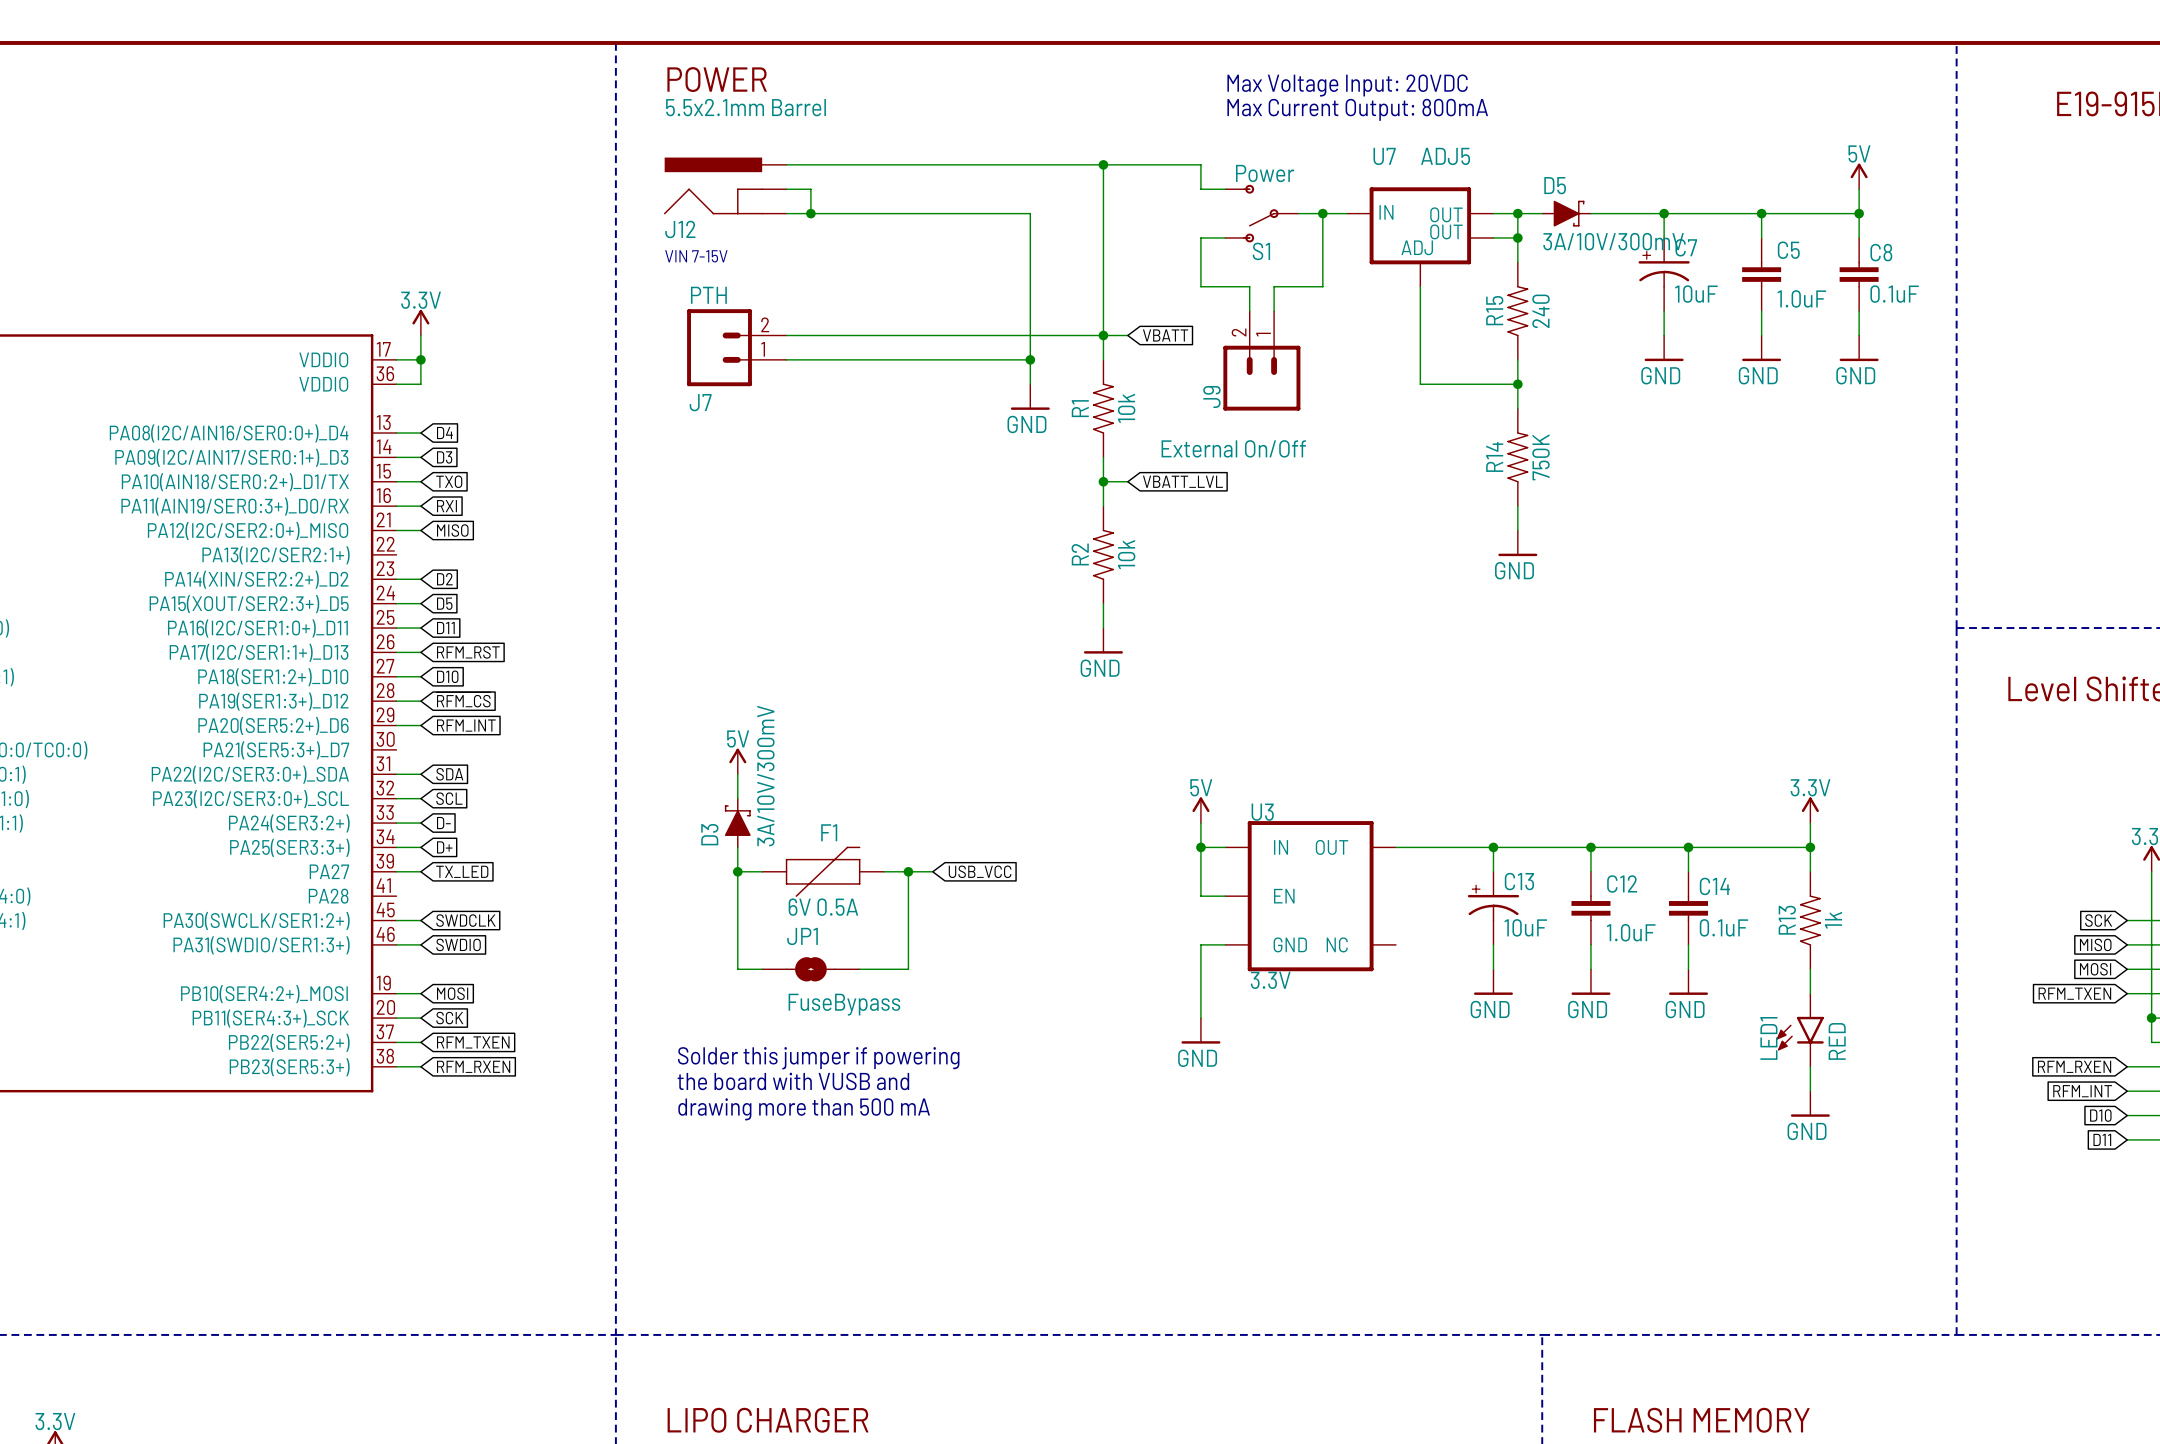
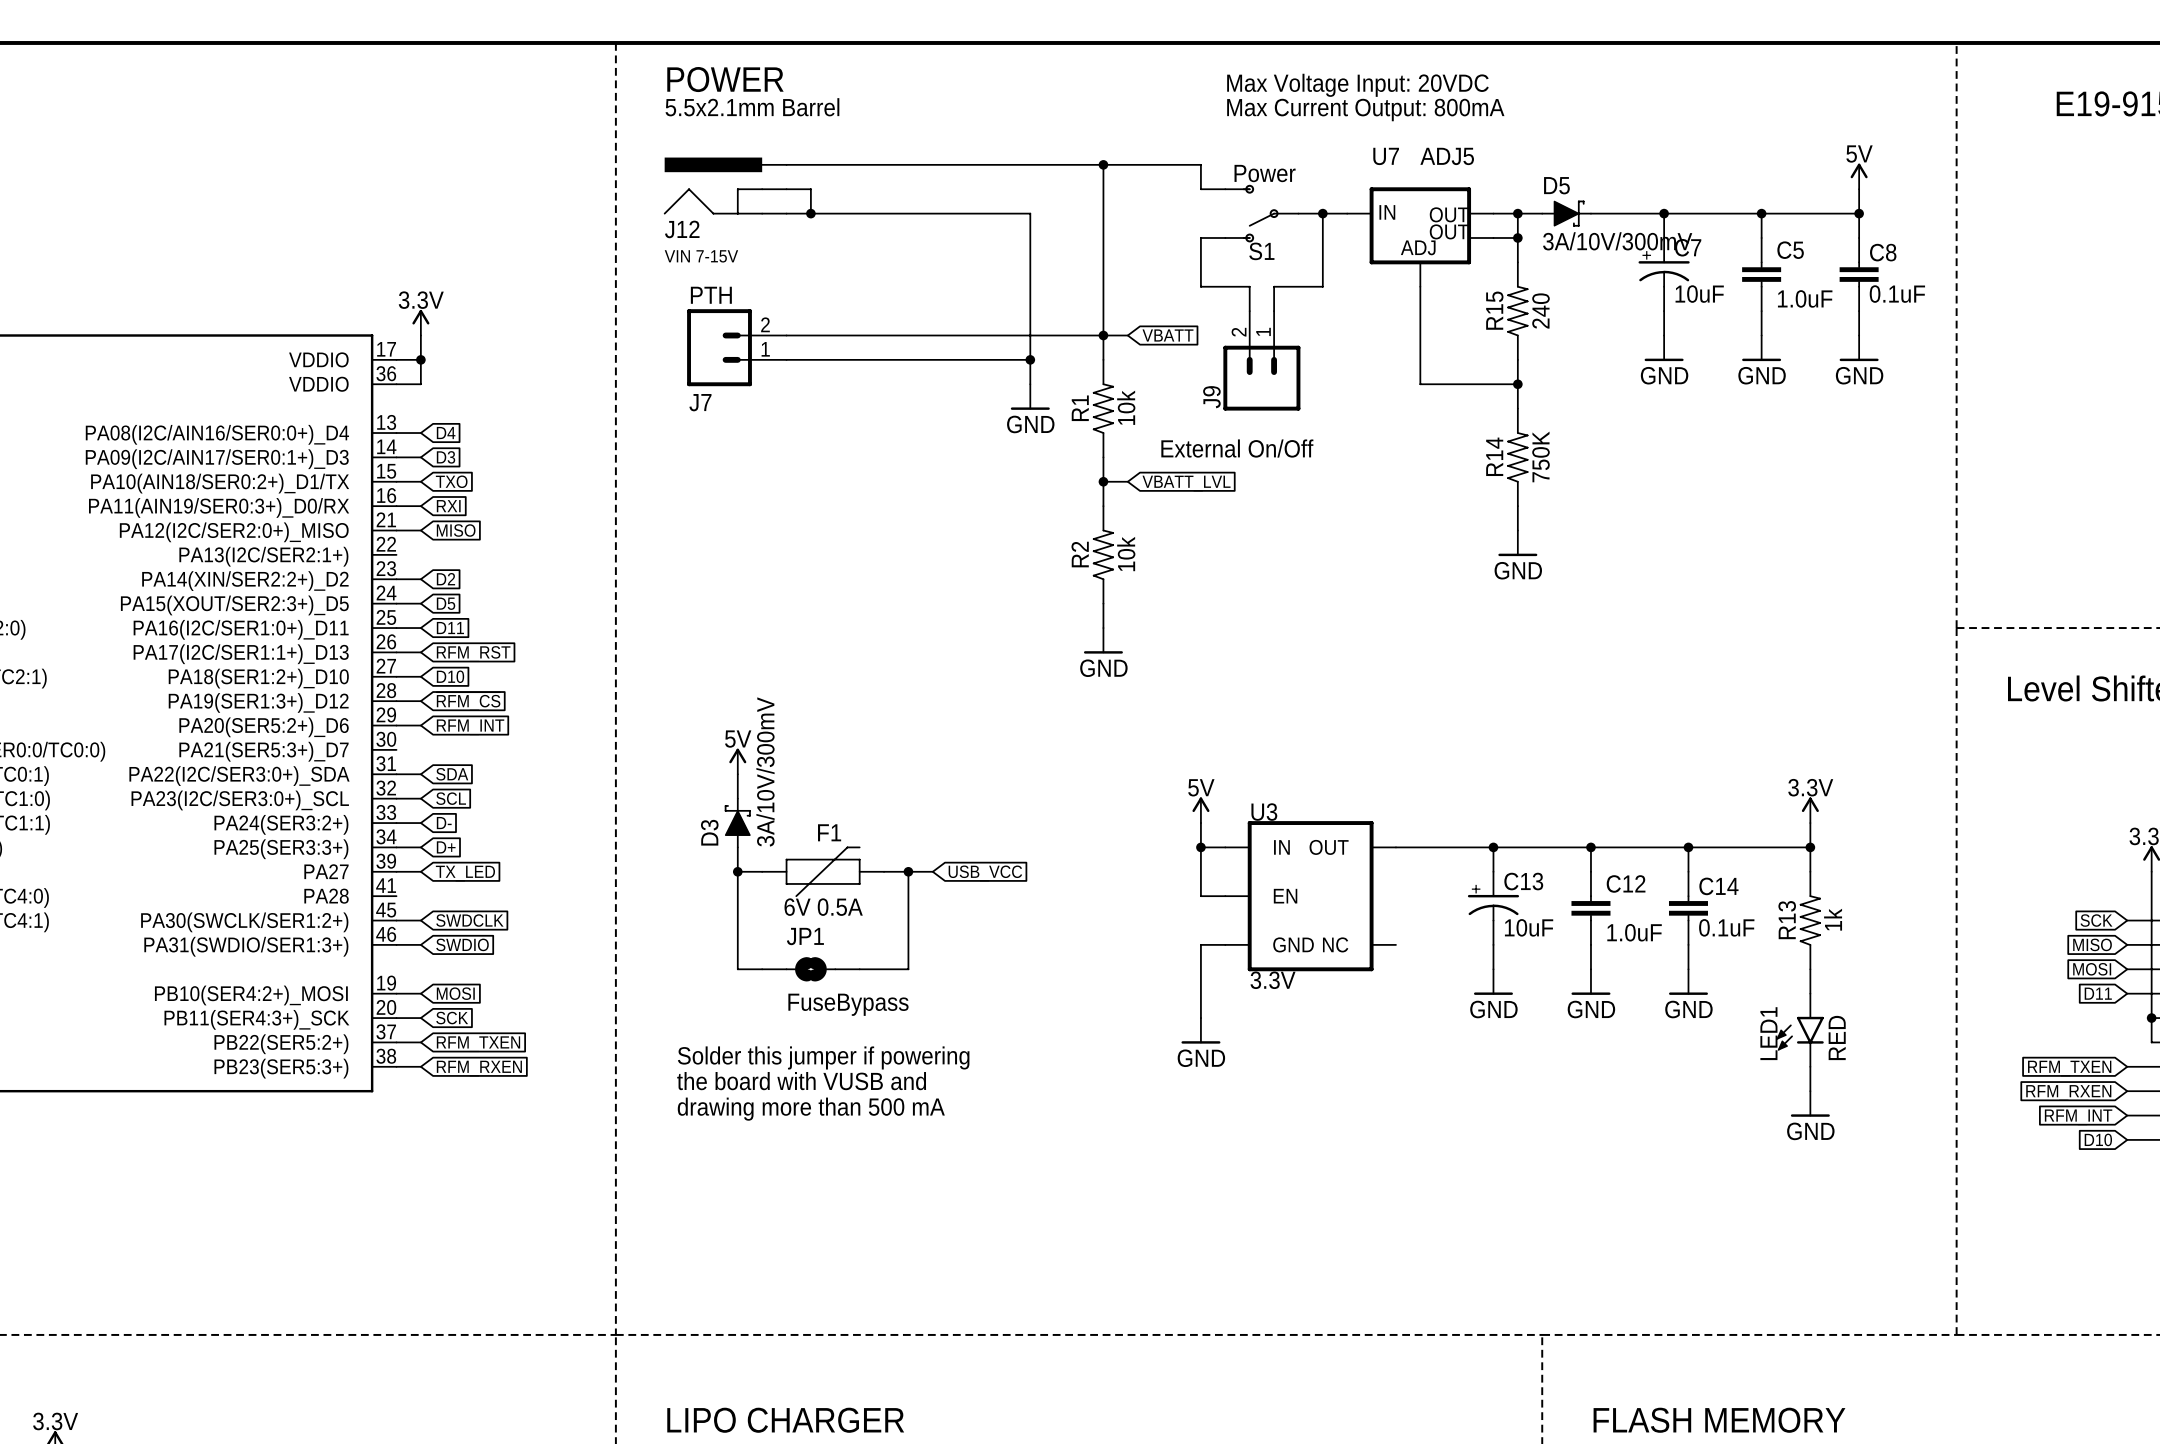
global label: RFM_TXEN (2074, 993) -> D11 (2098, 993)
global label: RFM_RXEN (2074, 1066) -> RFM_TXEN (2069, 1068)
global label: RFM_INT (2082, 1091) -> RFM_RXEN (2068, 1092)
global label: D10 (2100, 1115) -> RFM_INT (2078, 1117)
global label: D11 (2102, 1139) -> D10 (2098, 1139)

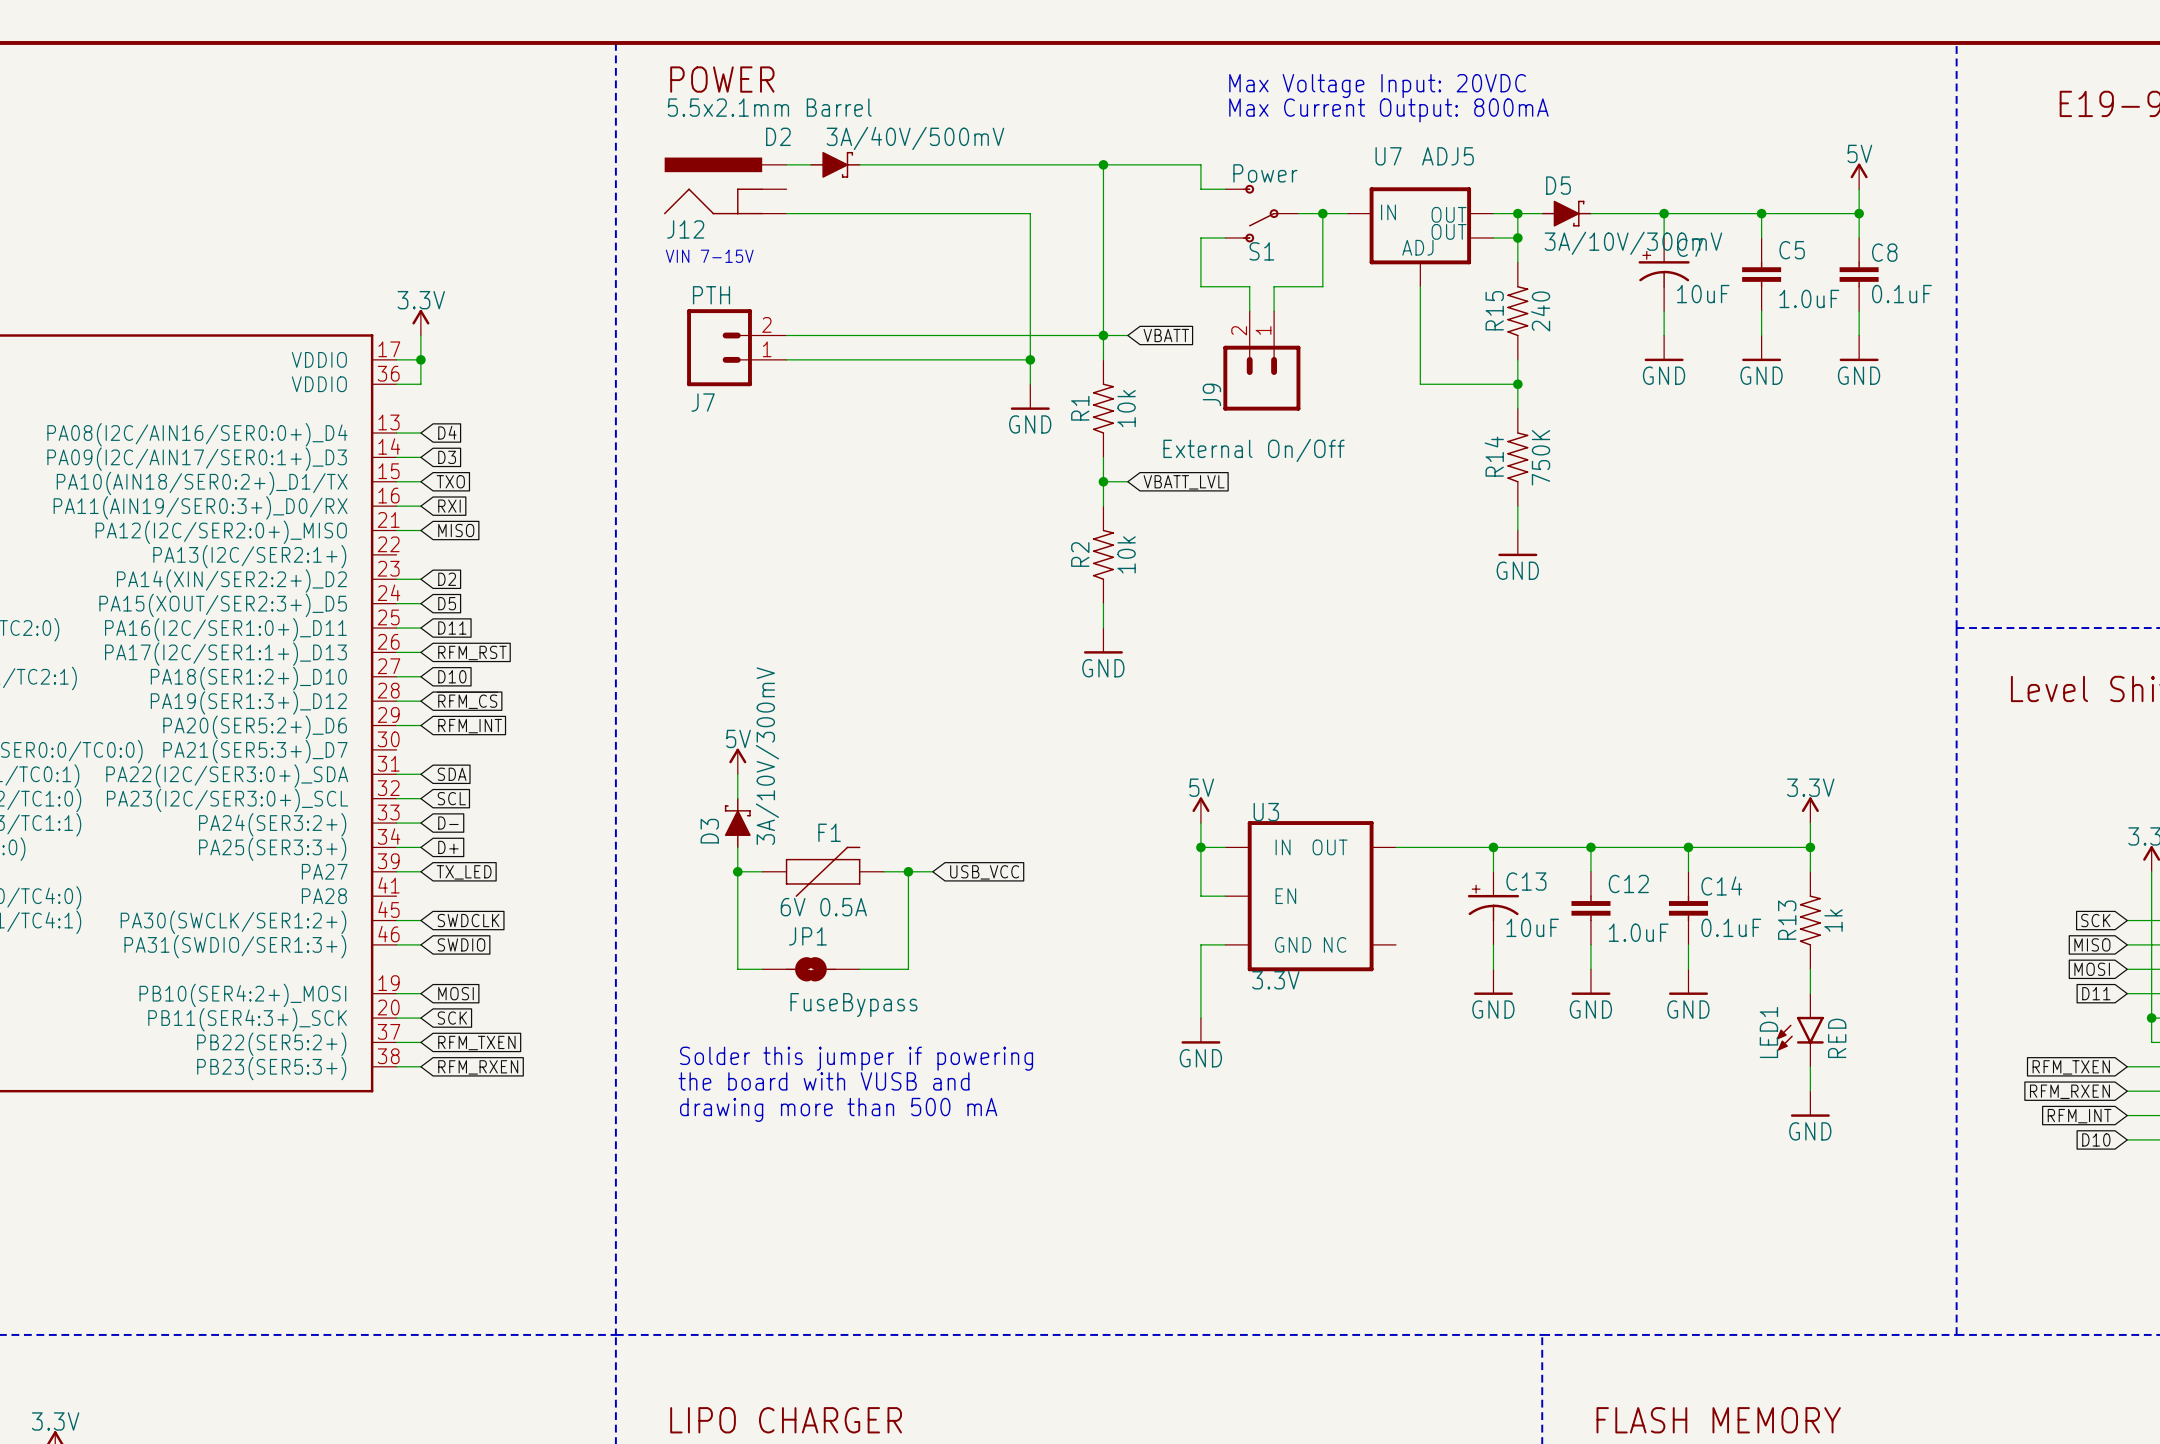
D2: none -> 3A/40V/500mV (835, 164)
wire: (786, 189) (810, 189) (810, 213) -> none
junction: (810, 213) -> none

